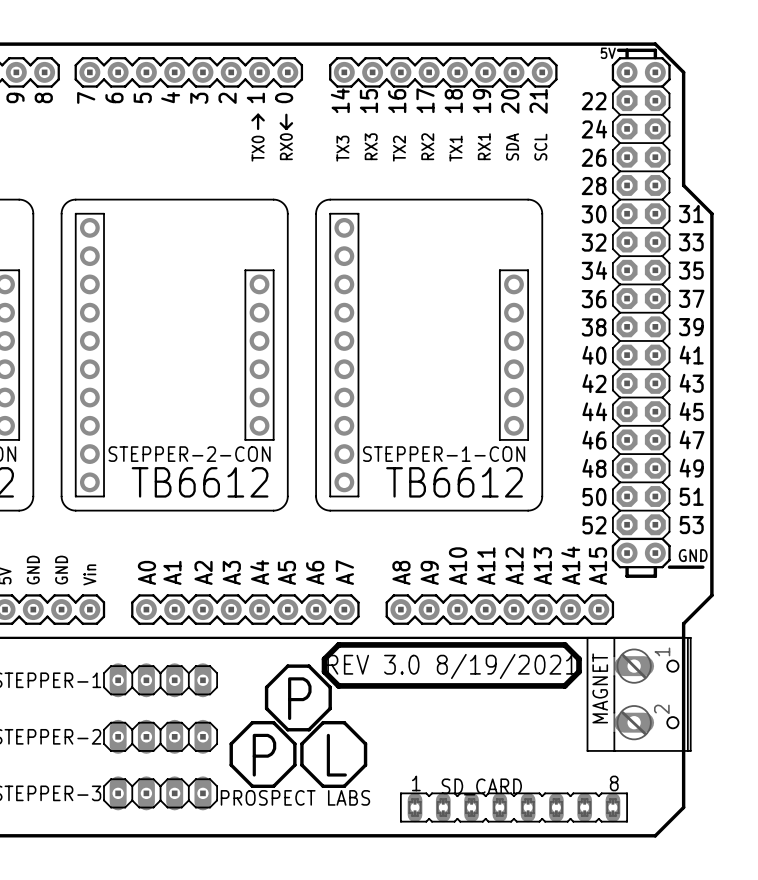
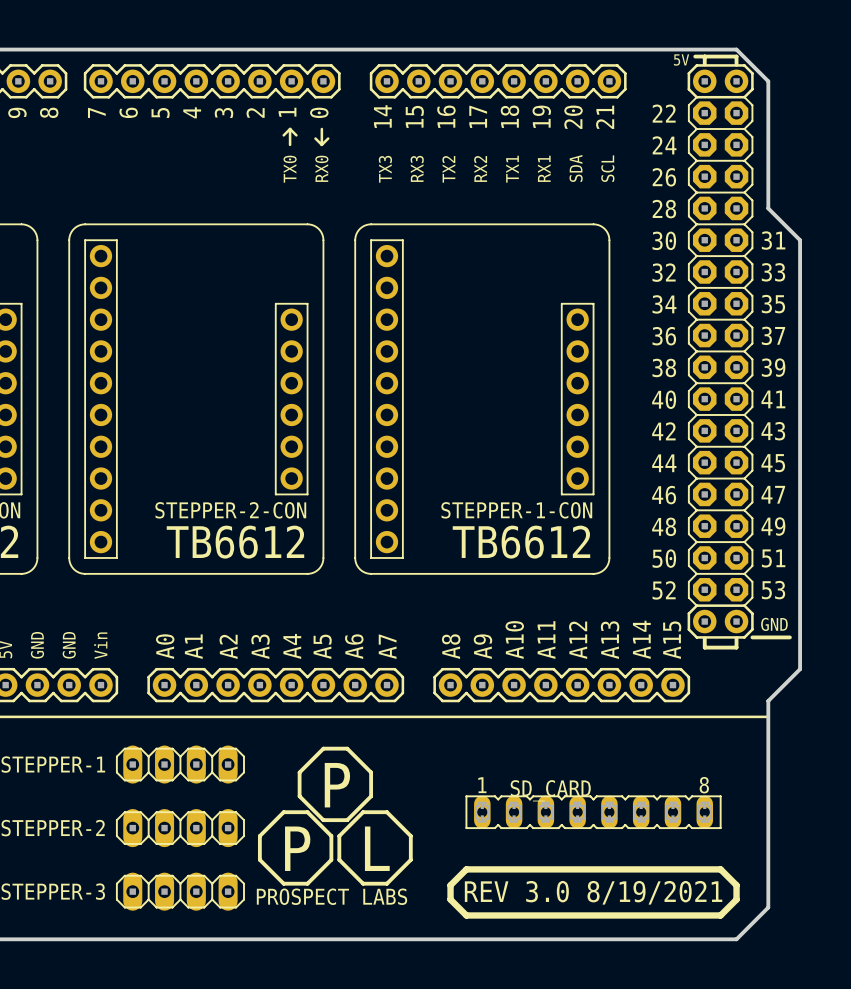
line: (338, 644) (564, 644) (579, 659) (579, 671) (564, 685) (338, 685) (324, 671) (324, 659) (338, 644) -> (466, 869) (720, 869) (736, 885) (736, 899) (720, 915) (466, 915) (450, 899) (450, 885) (466, 869)
text position: REV 3.0 8/19/2021 (452, 666) -> REV 3.0 8/19/2021 (593, 892)
MAGNET: (639, 694) -> none
SD_CARD position: (513, 807) -> (593, 812)

